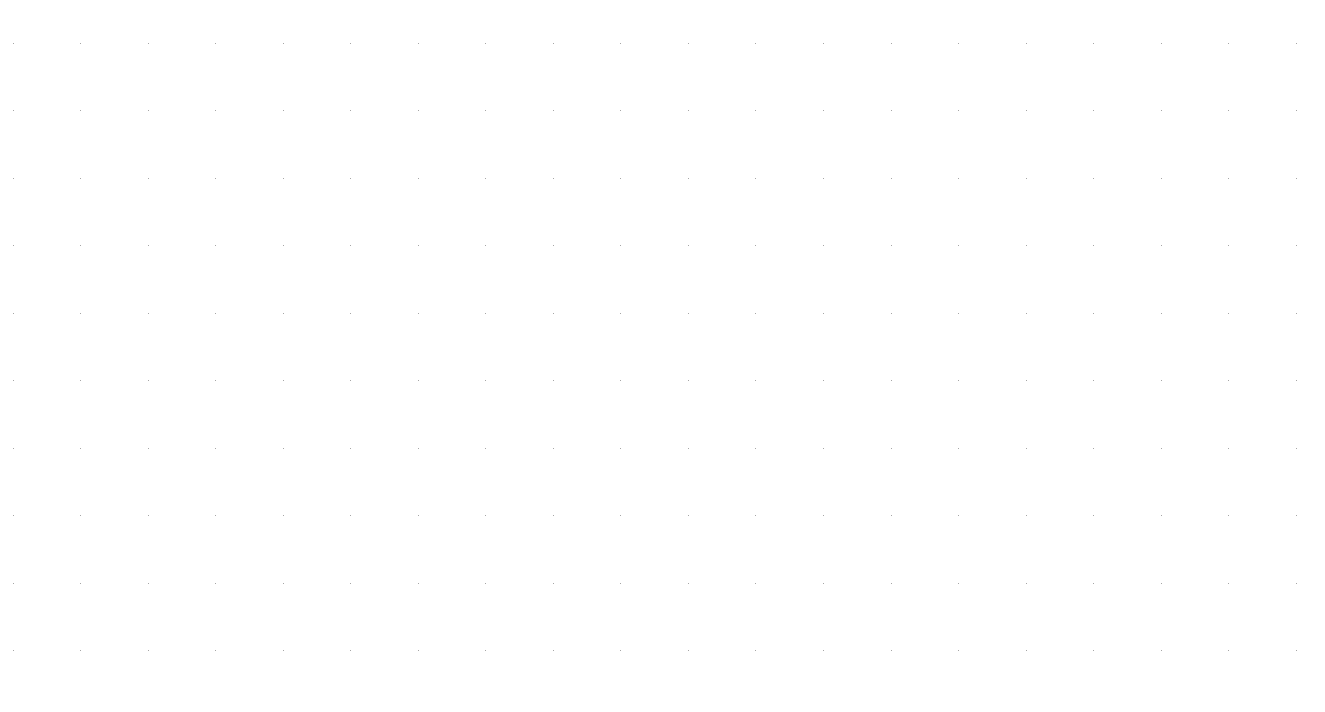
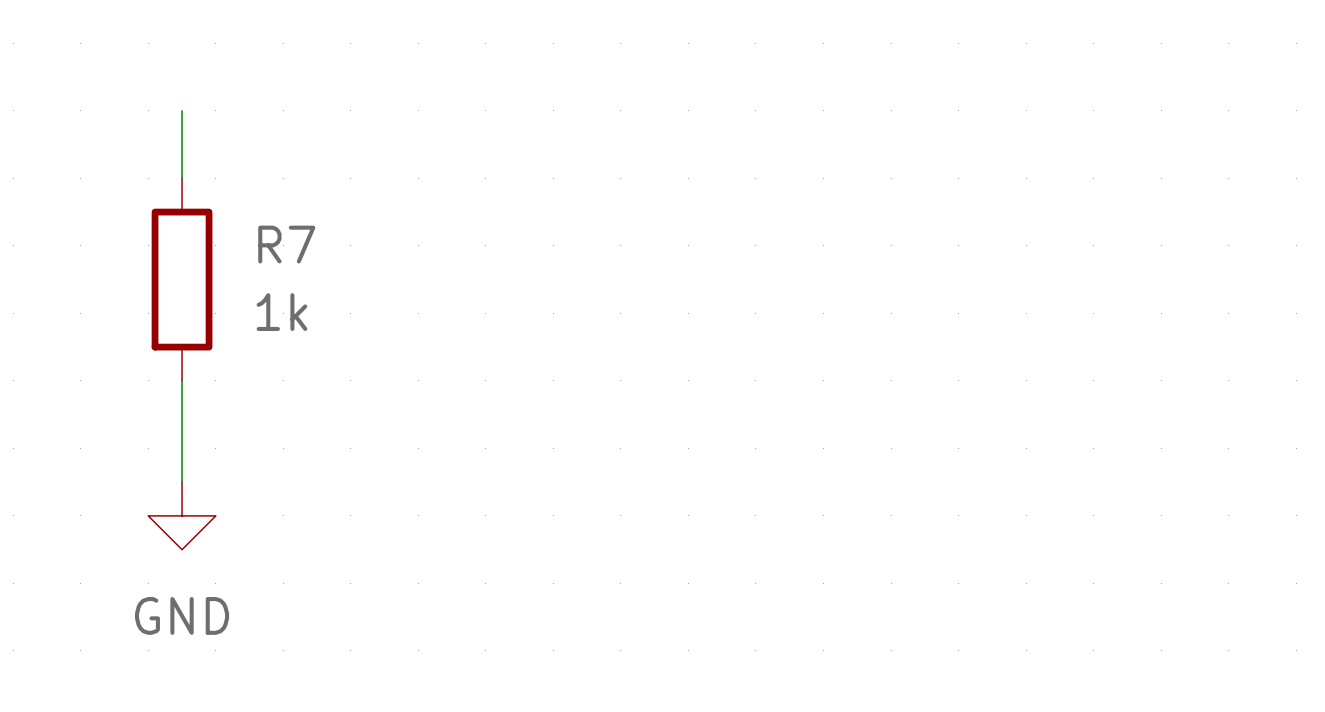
wire: none -> (182, 110) (182, 178)
R7: none -> 1k (182, 279)
wire: none -> (182, 380) (182, 482)
power symbol: none -> GND (182, 515)

